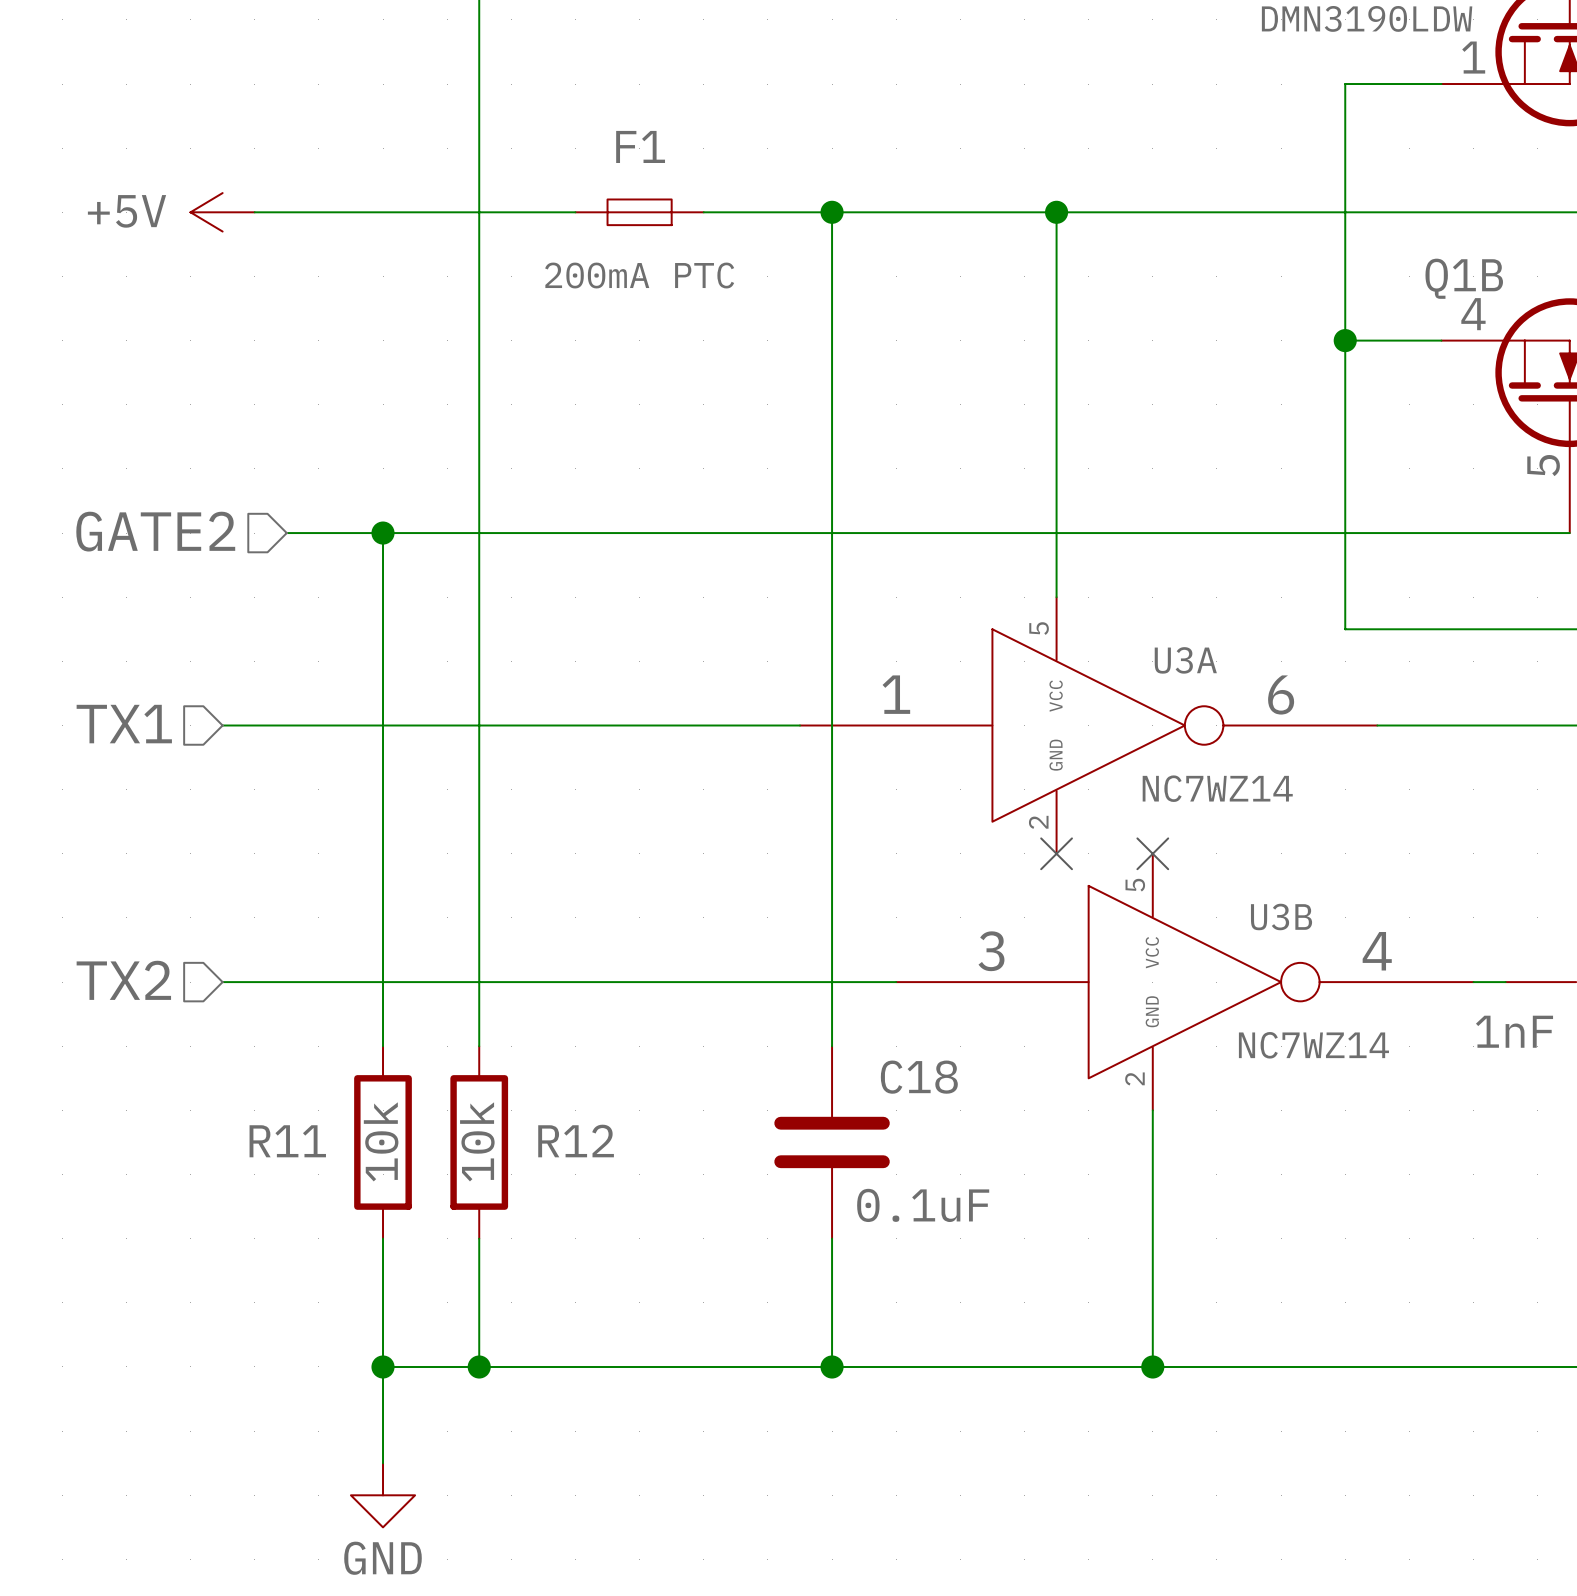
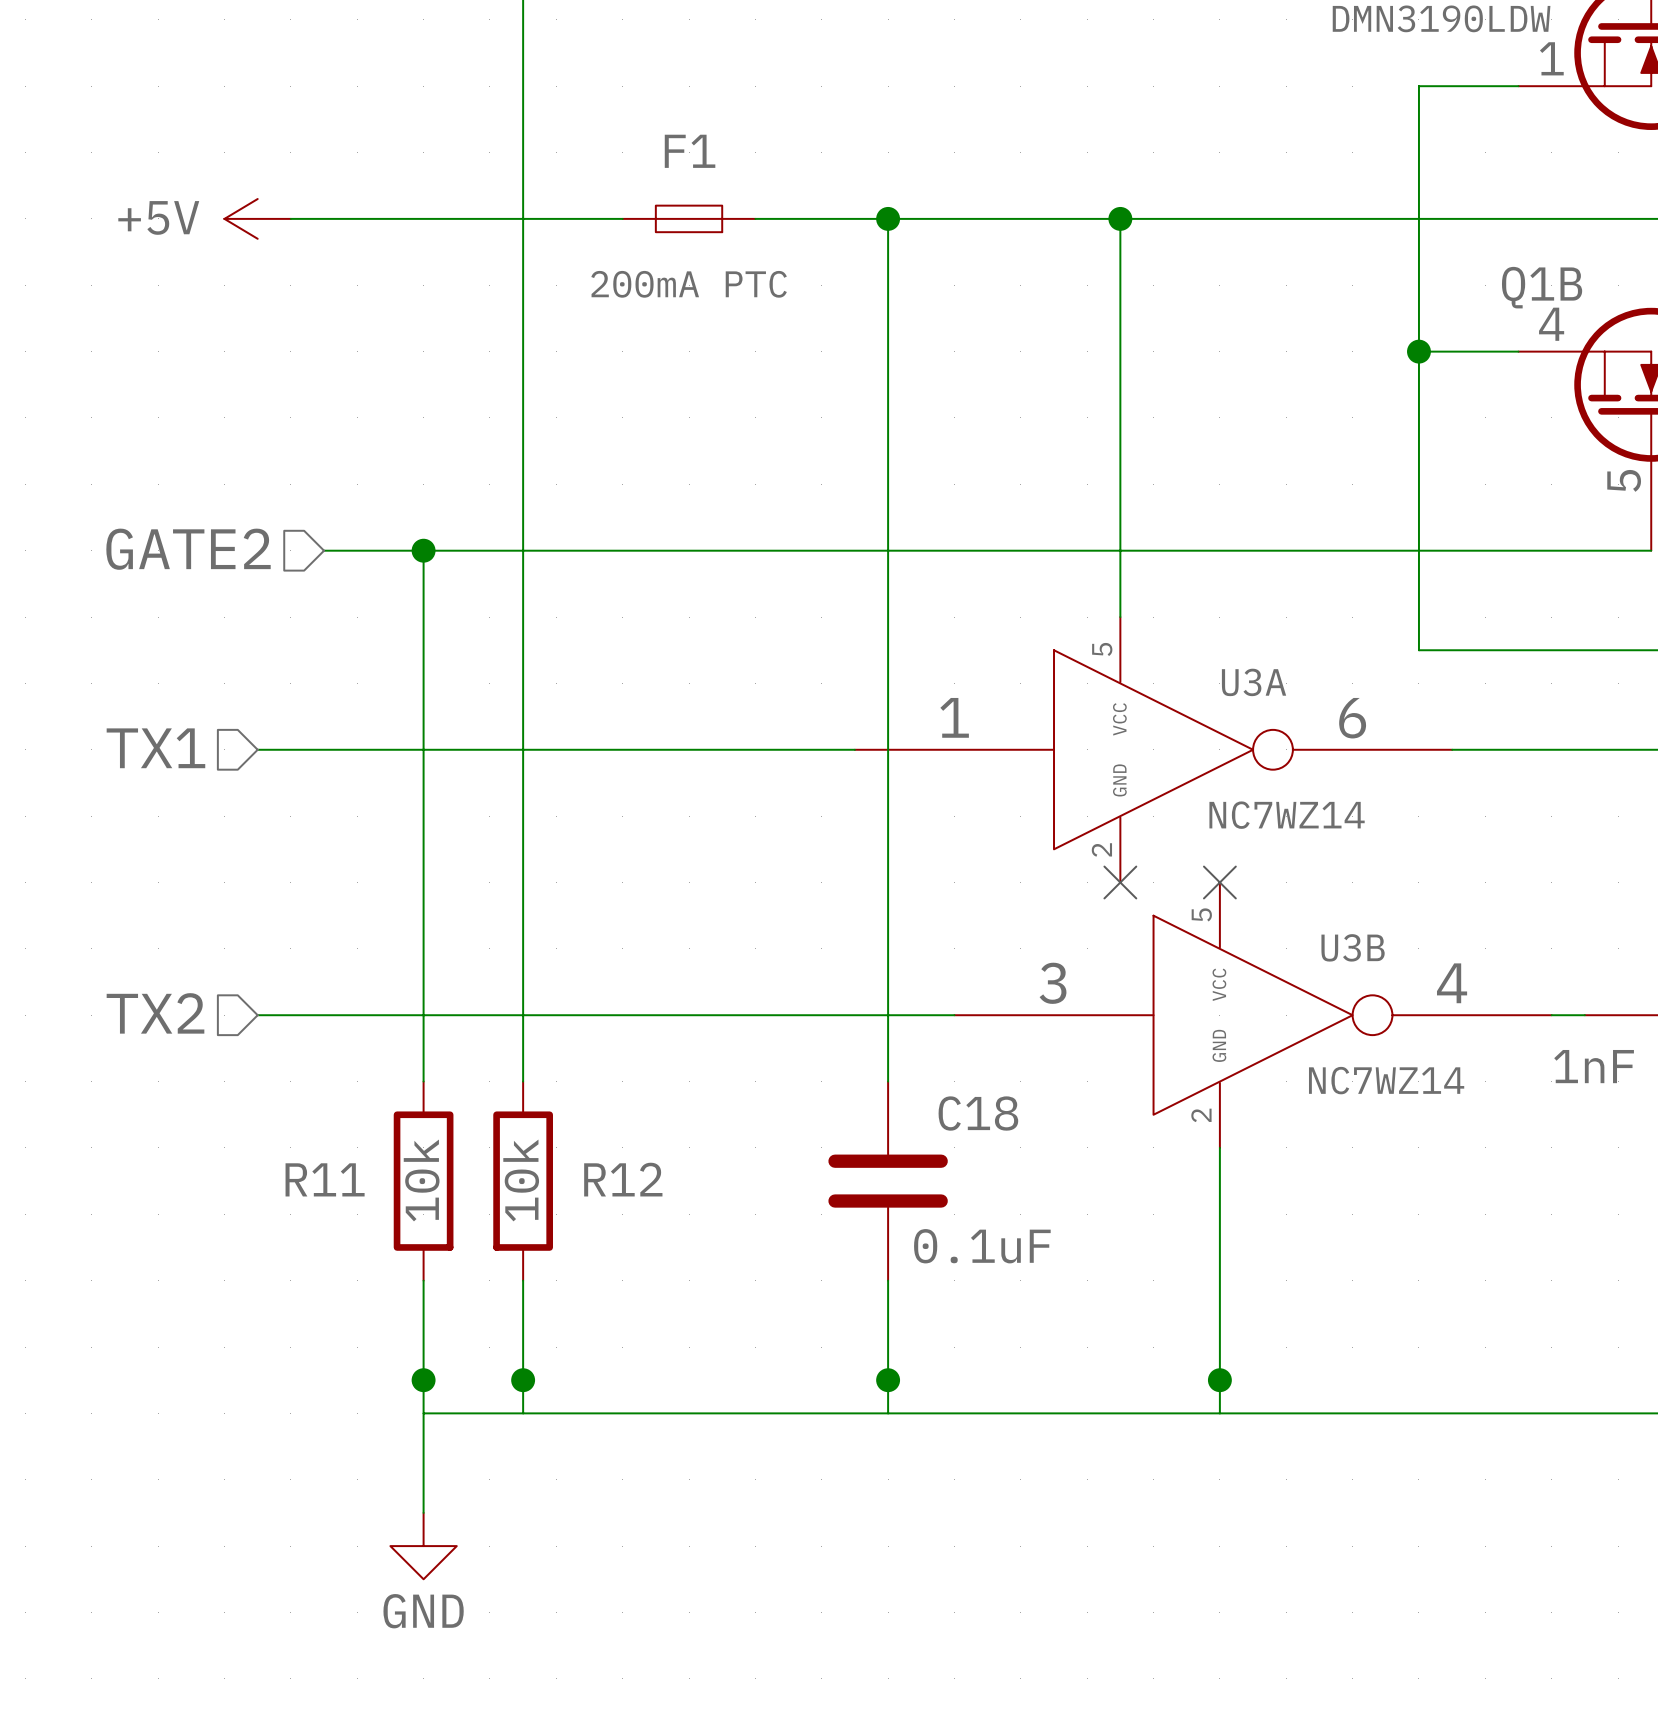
junction position: (383, 1366) -> (423, 1380)
junction position: (479, 1366) -> (523, 1380)
junction position: (832, 1366) -> (888, 1380)
junction position: (1152, 1366) -> (1219, 1380)

